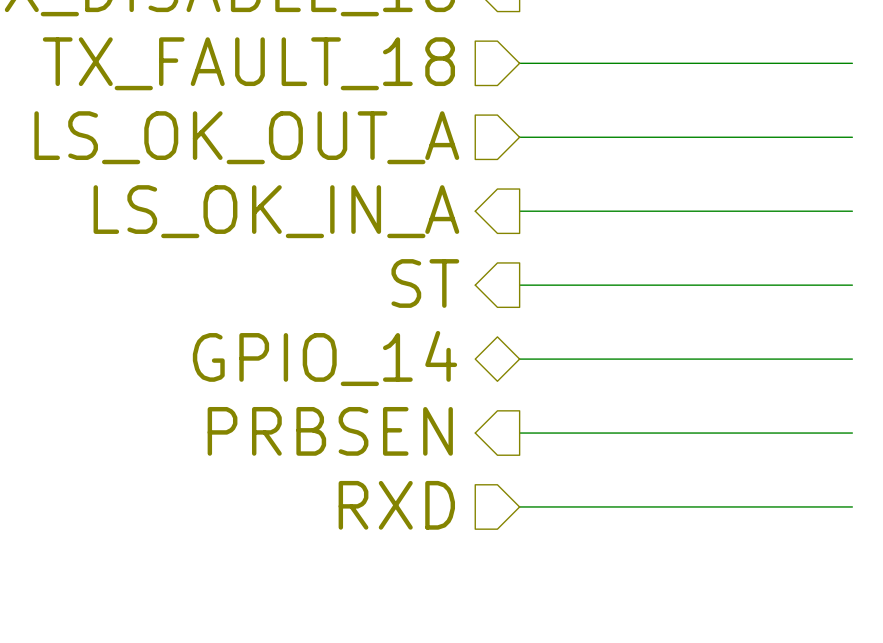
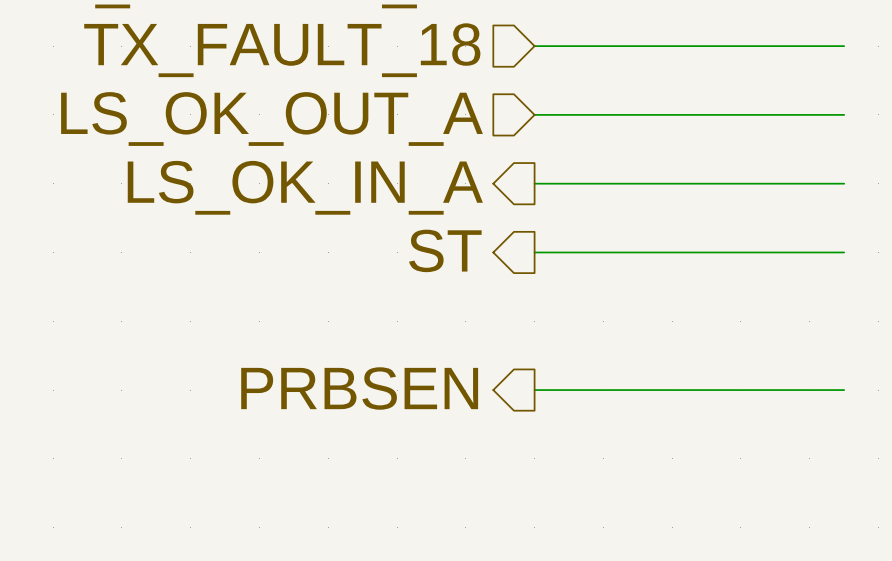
hierarchical label: GPIO_14 (324, 358) -> none
wire: (519, 359) (852, 359) -> none
hierarchical label: RXD (396, 505) -> none
wire: (519, 506) (852, 506) -> none

